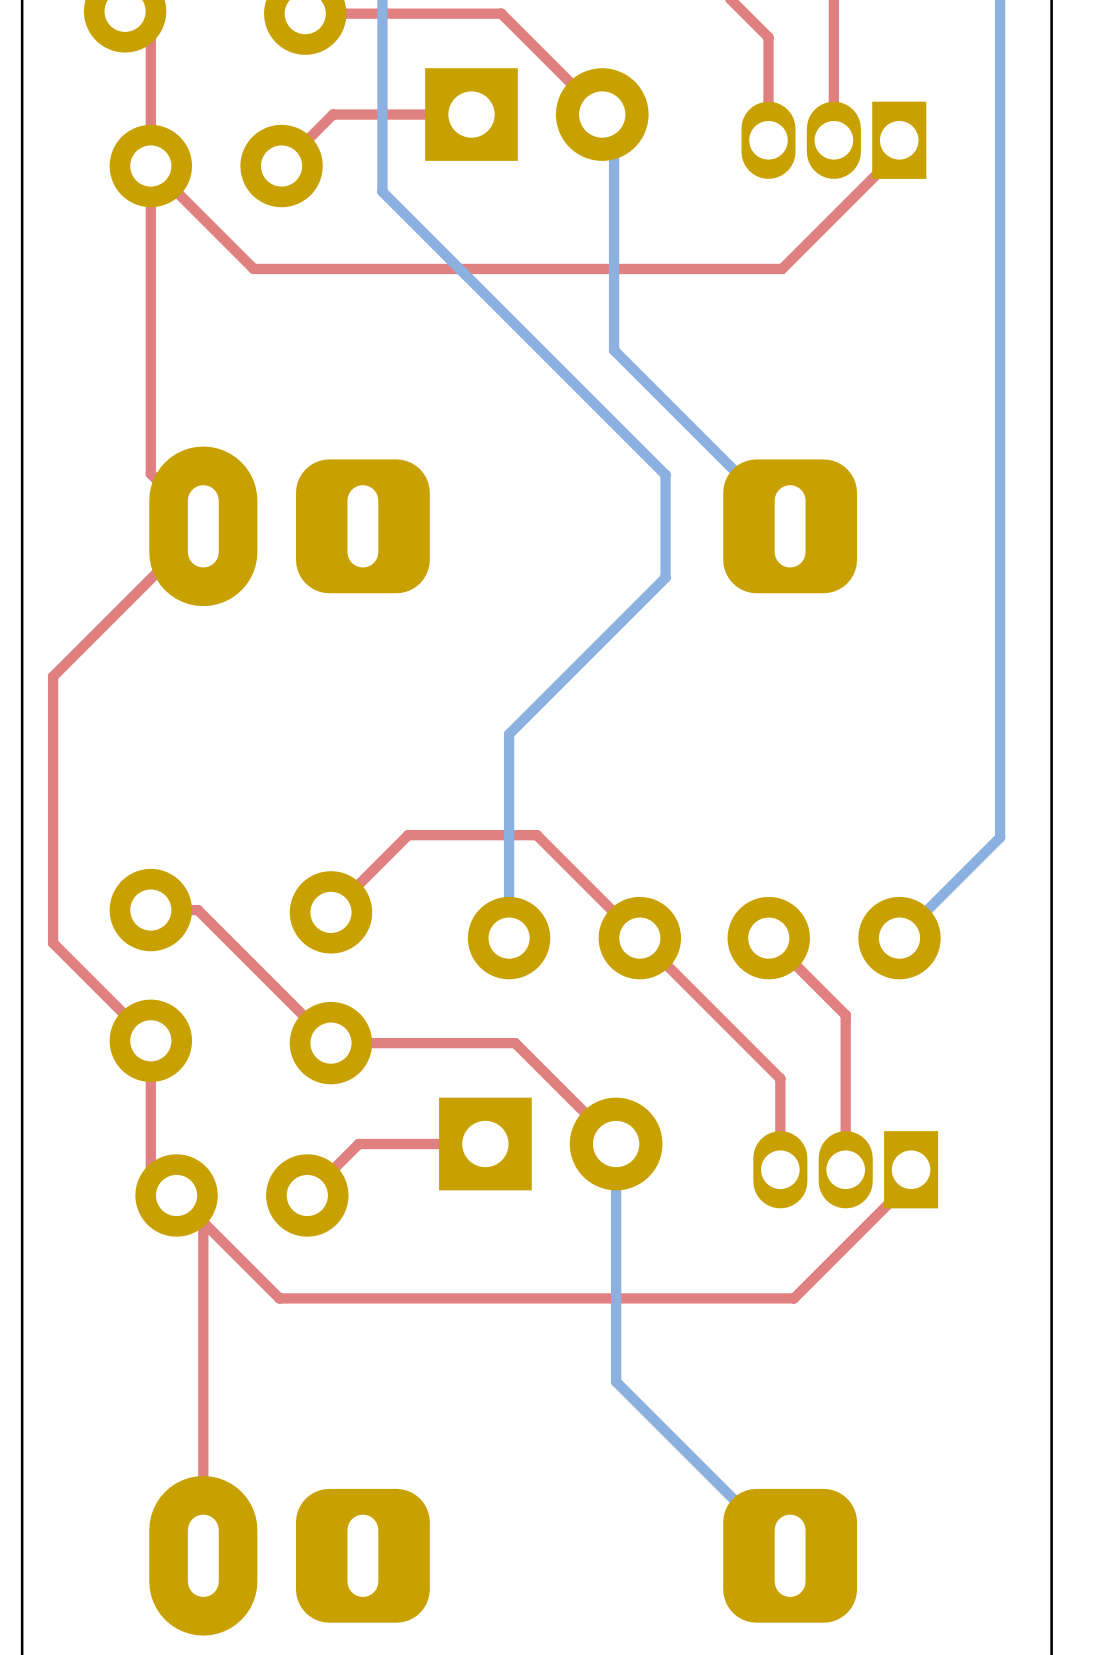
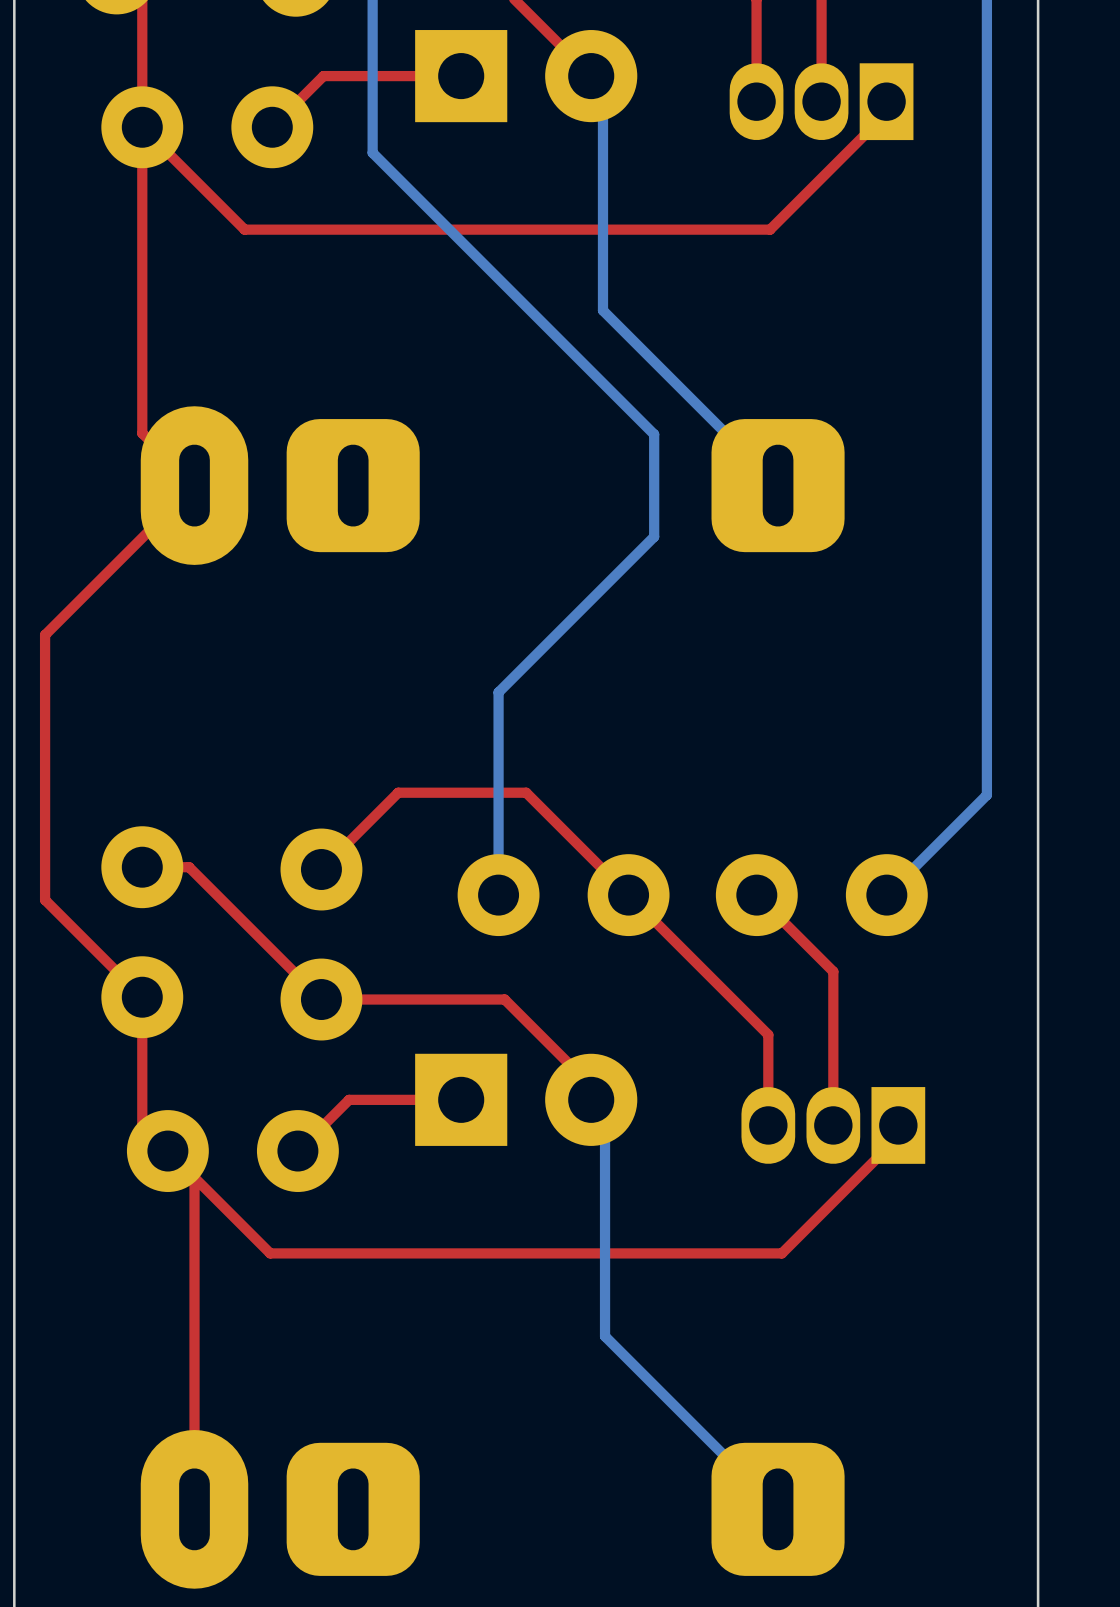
part position: (550, 1144) -> (526, 1099)

